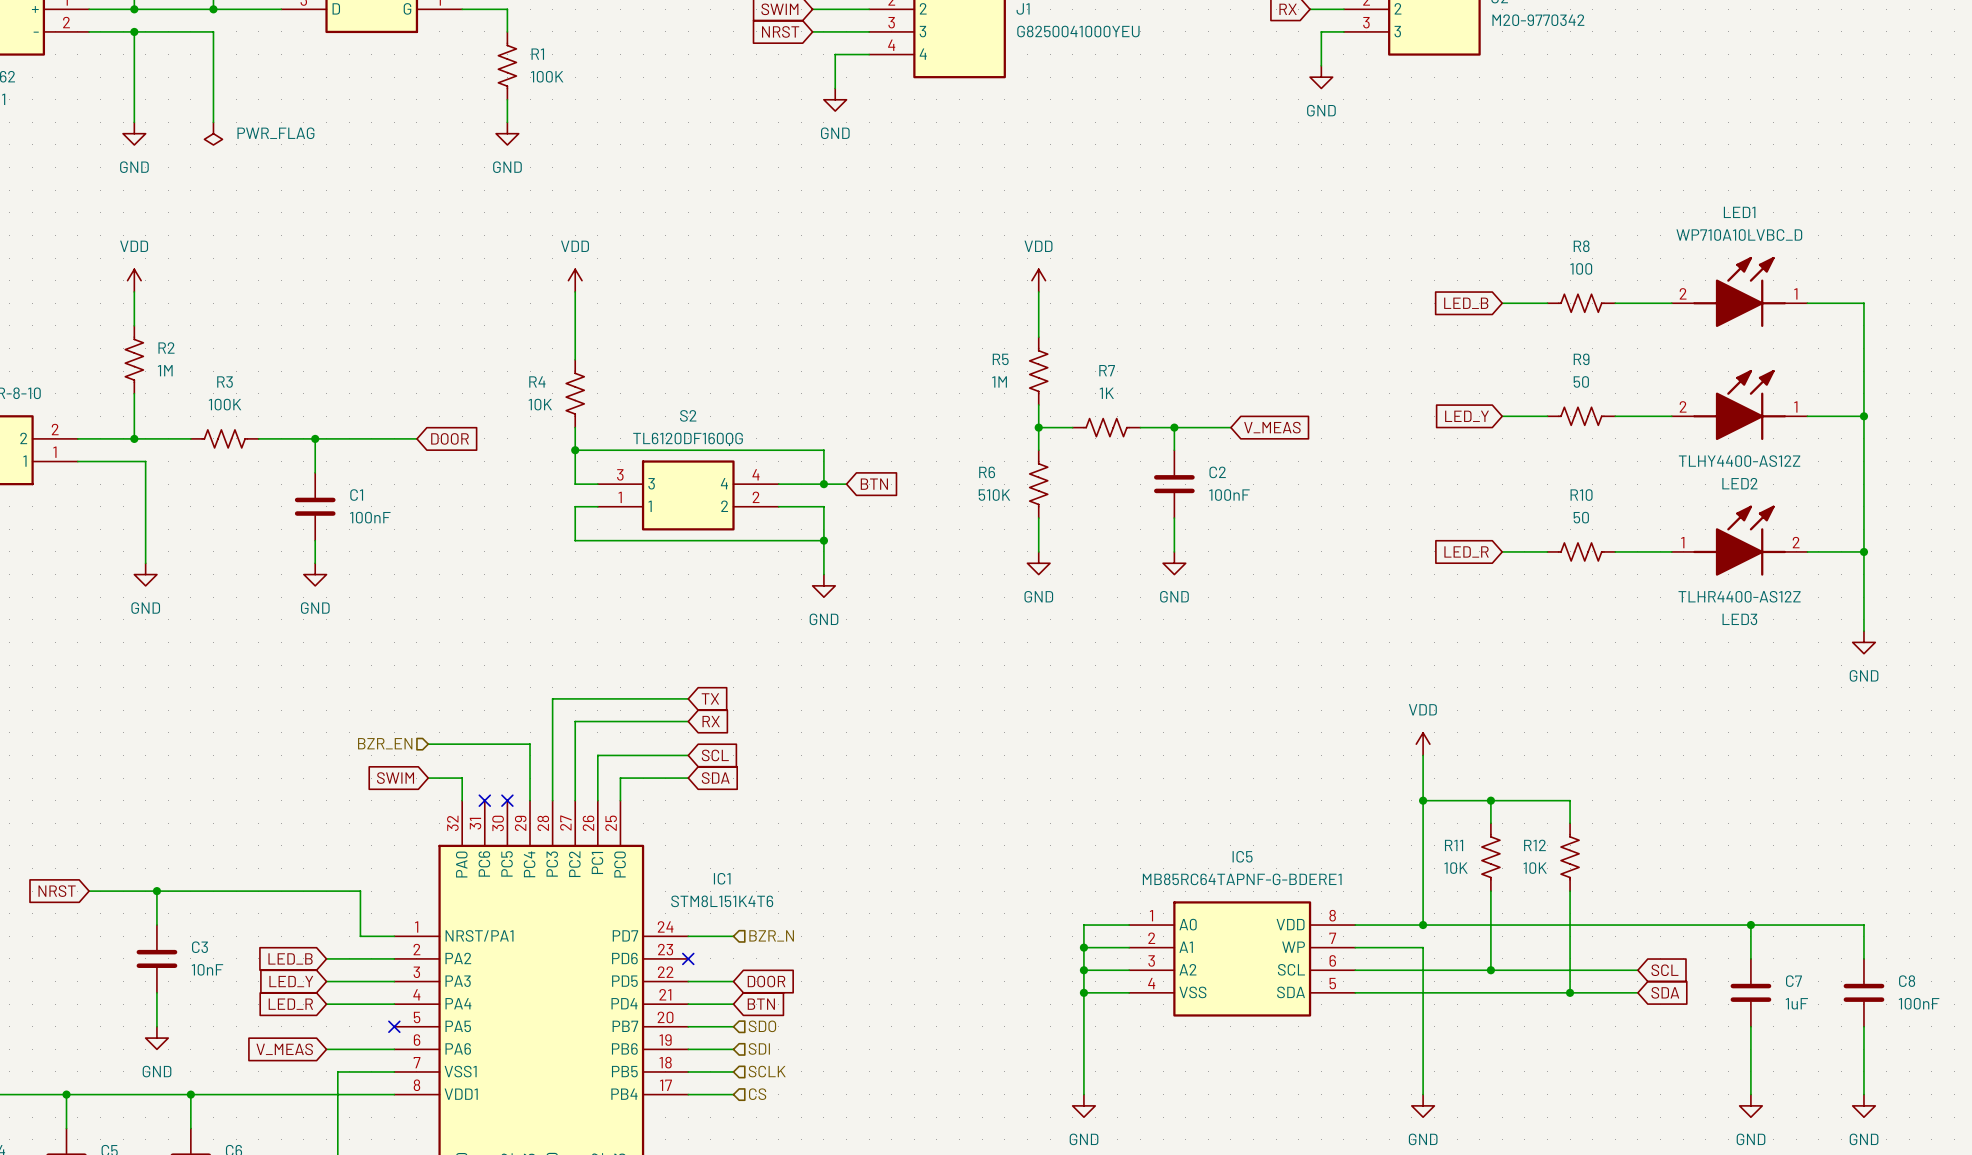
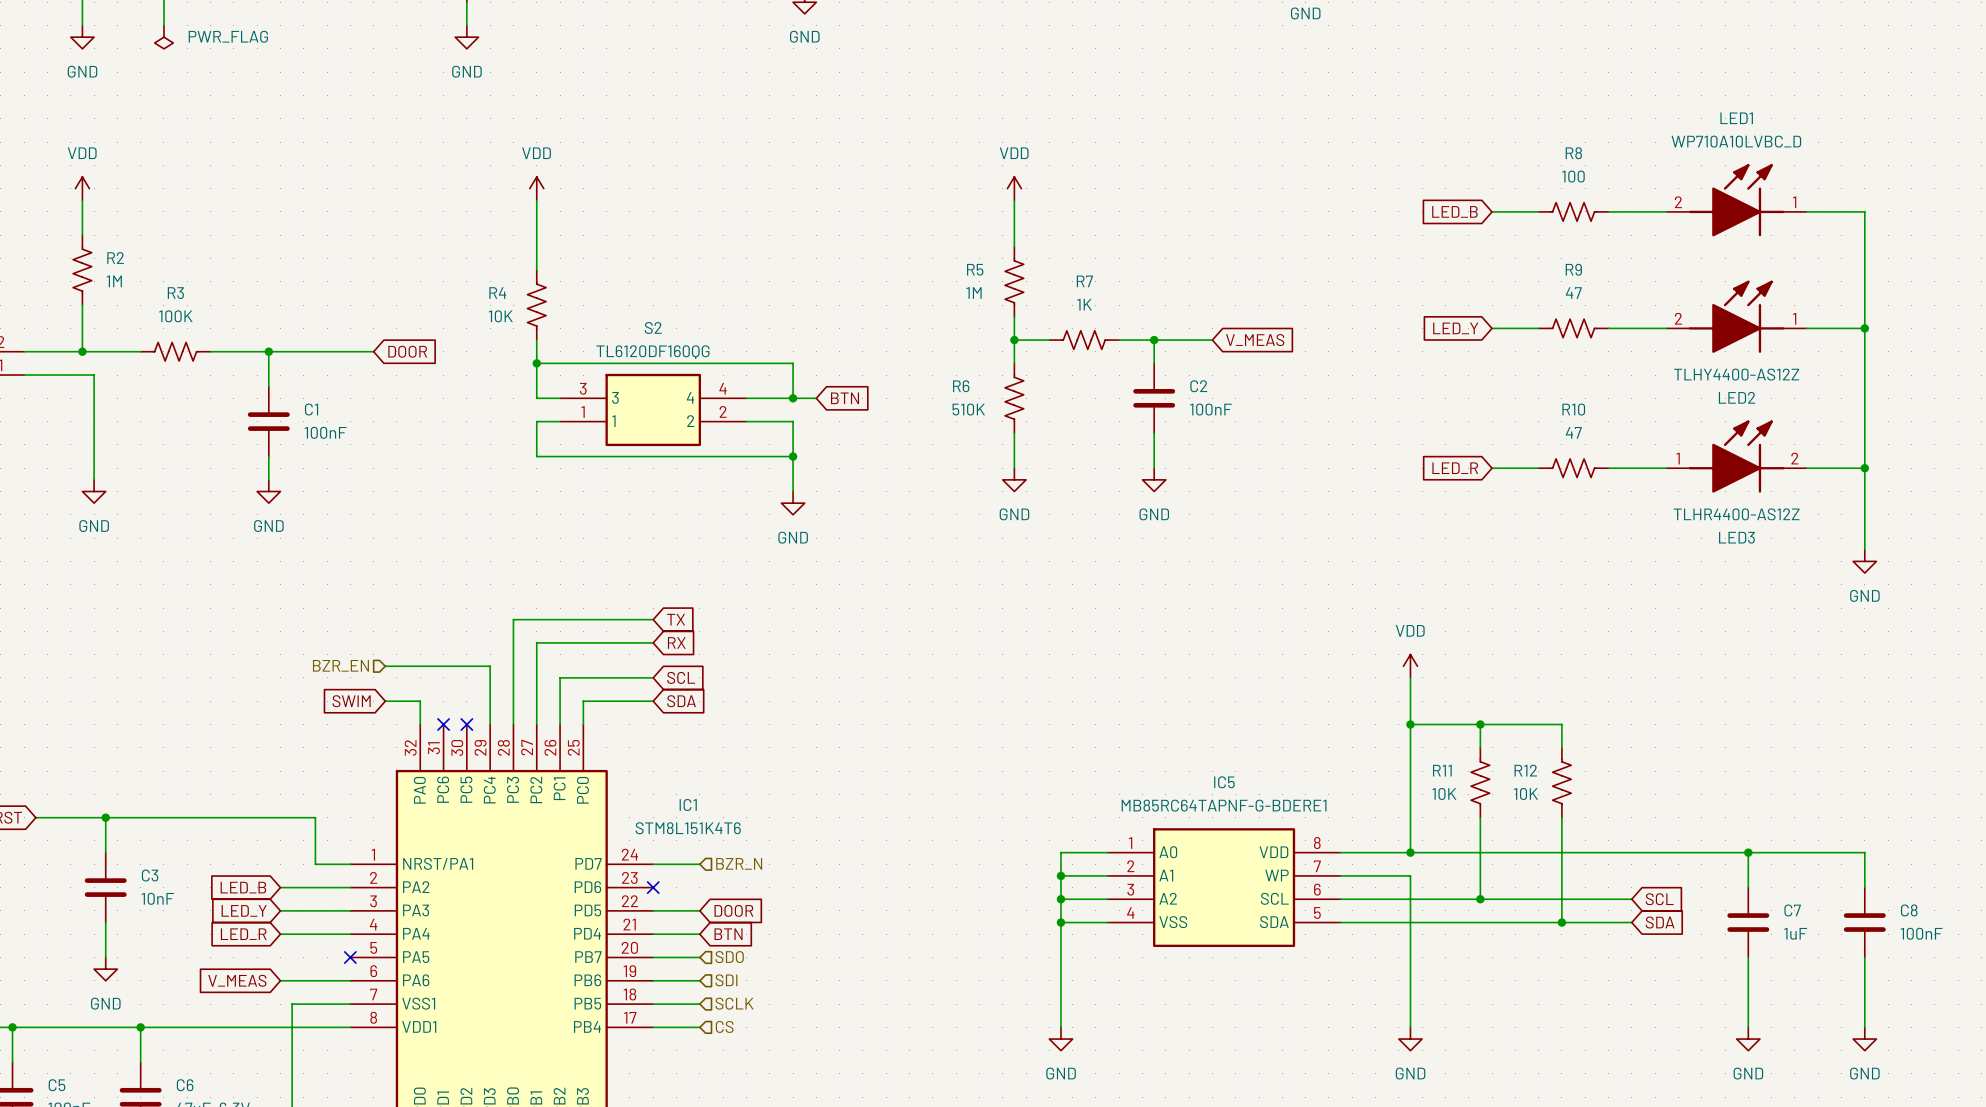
R9 value: 50 (1581, 381) -> 47 (1573, 293)
R10 value: 50 (1581, 517) -> 47 (1573, 432)

